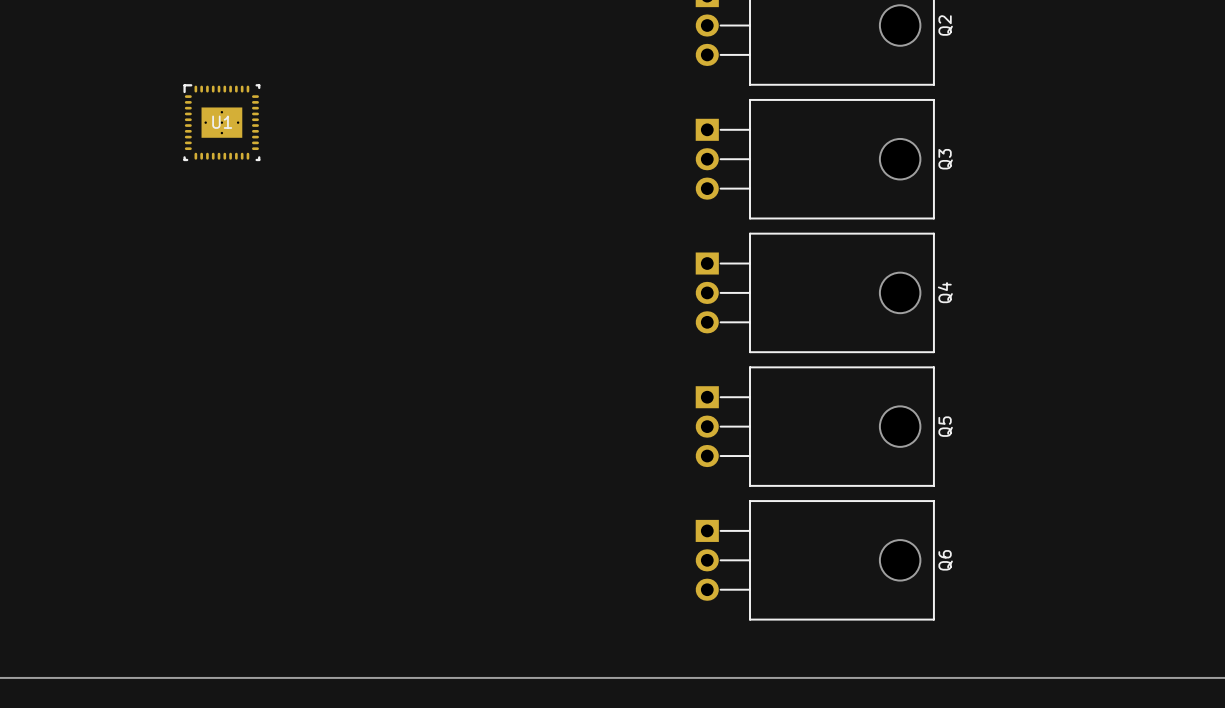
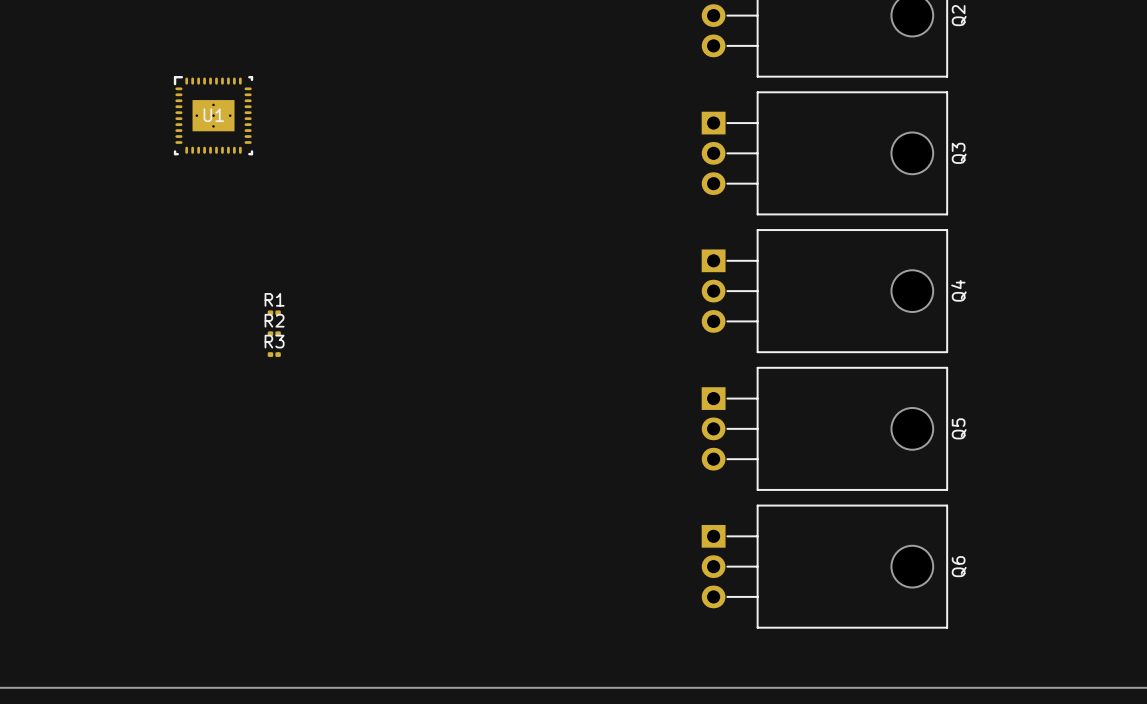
R1: none -> (274, 312)
R2: none -> (274, 333)
R3: none -> (274, 354)

